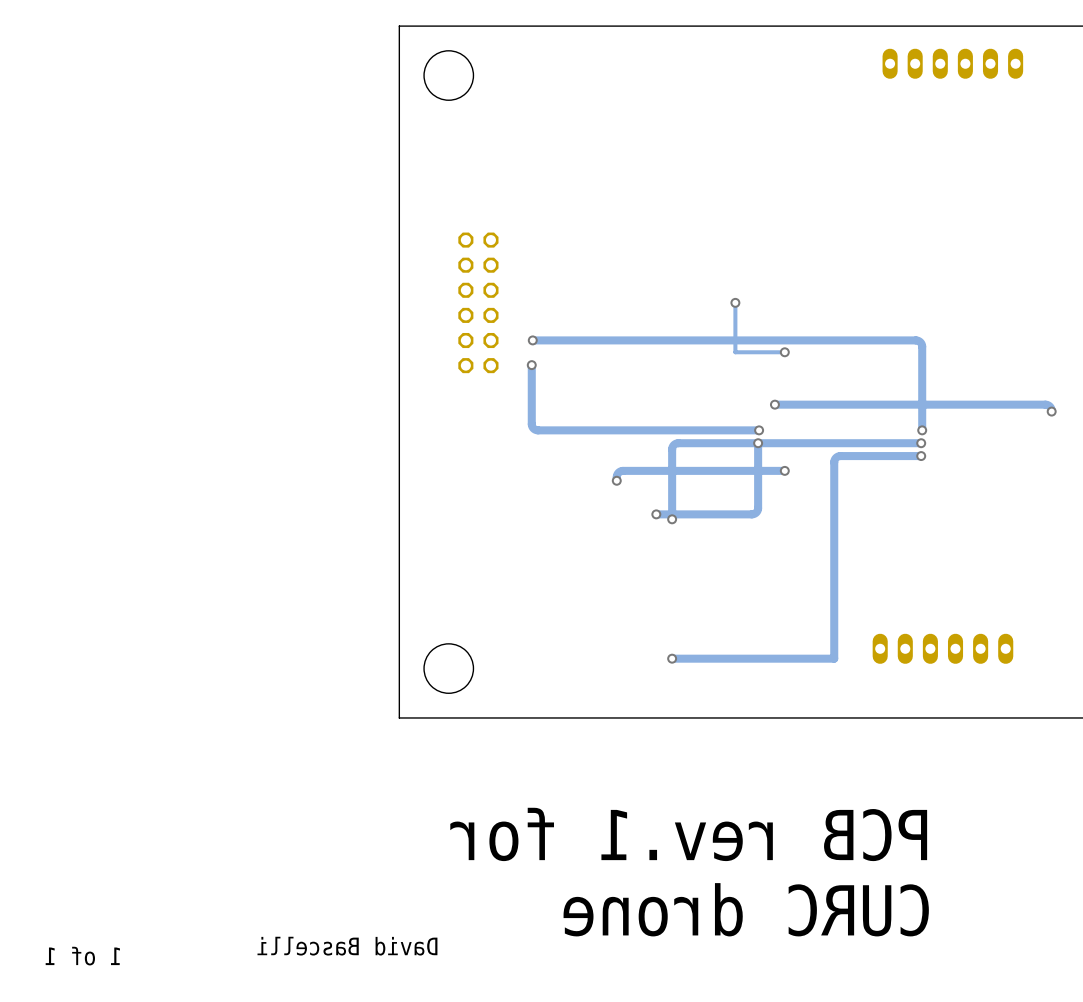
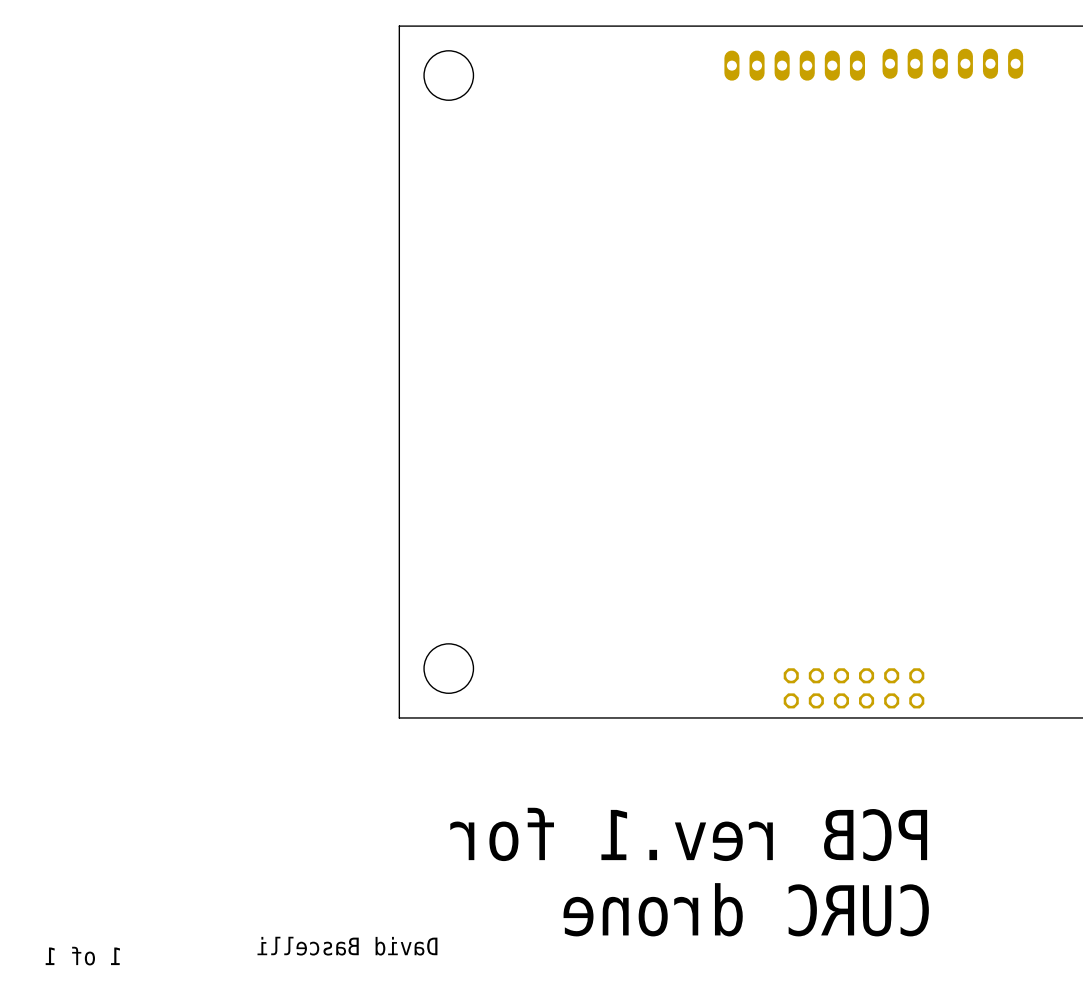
part: none -> (794, 65)
part: (478, 302) -> none
track: (735, 302) (735, 352) (784, 352) -> none
via: (735, 302) -> none
track: (532, 340) (917, 340) (922, 346) (922, 430) -> none
via: (532, 340) -> none
via: (784, 352) -> none
track: (531, 365) (531, 424) (536, 430) (759, 430) -> none
via: (531, 365) -> none
track: (774, 404) (1045, 404) (1049, 406) (1051, 411) -> none
via: (774, 404) -> none
via: (1051, 411) -> none
via: (759, 430) -> none
via: (922, 430) -> none
track: (758, 443) (758, 508) (755, 513) (656, 514) -> none
via: (758, 443) -> none
track: (921, 443) (676, 443) (672, 449) (672, 519) -> none
via: (921, 443) -> none
track: (921, 456) (840, 456) (834, 459) (834, 658) (672, 658) -> none
via: (921, 456) -> none
track: (784, 470) (623, 470) (617, 474) (616, 480) -> none
via: (784, 470) -> none
via: (616, 480) -> none
via: (656, 514) -> none
via: (672, 519) -> none
part: (942, 648) -> none
via: (672, 658) -> none
part: none -> (854, 688)

